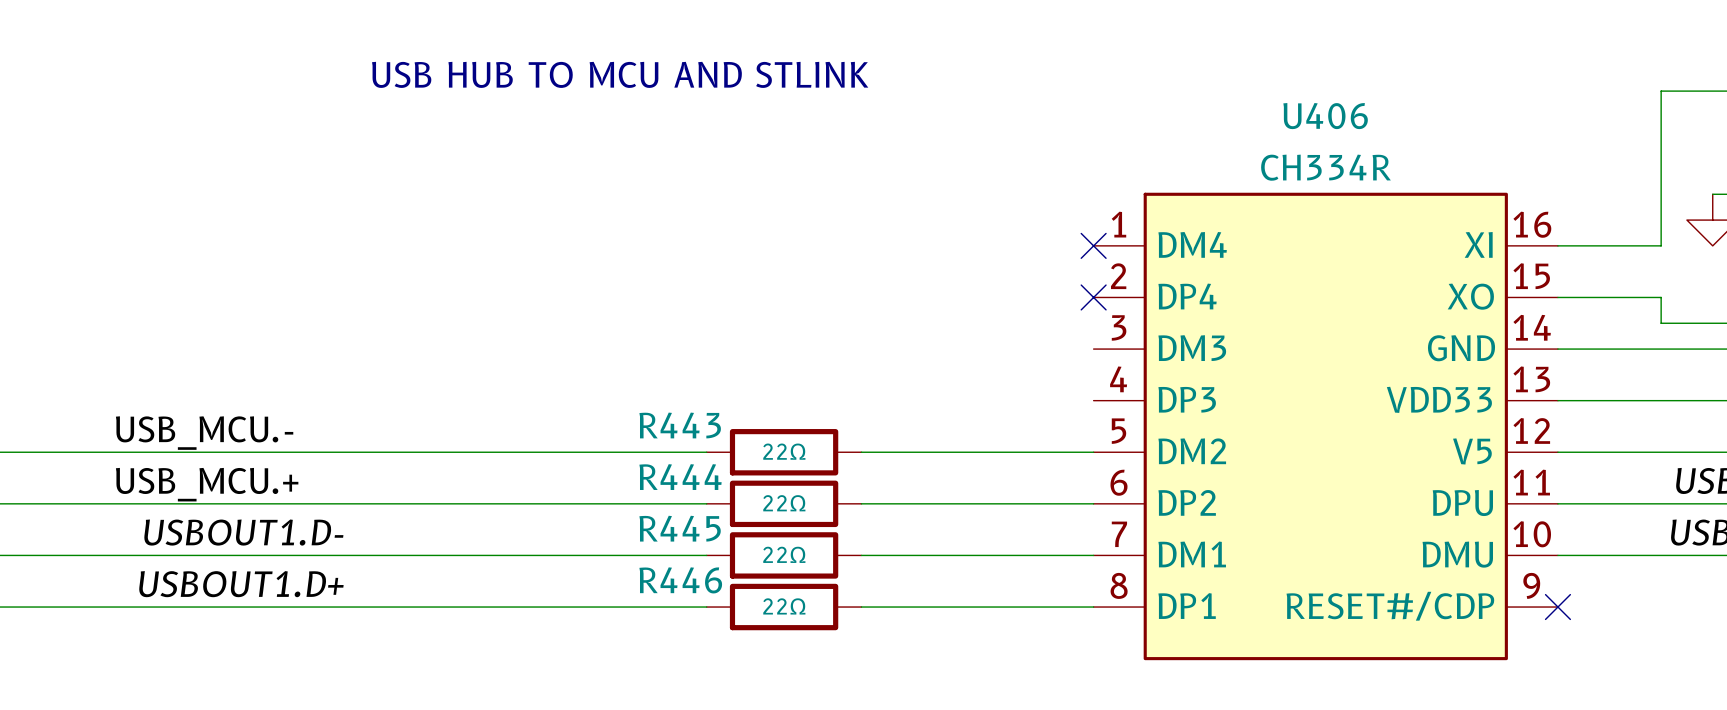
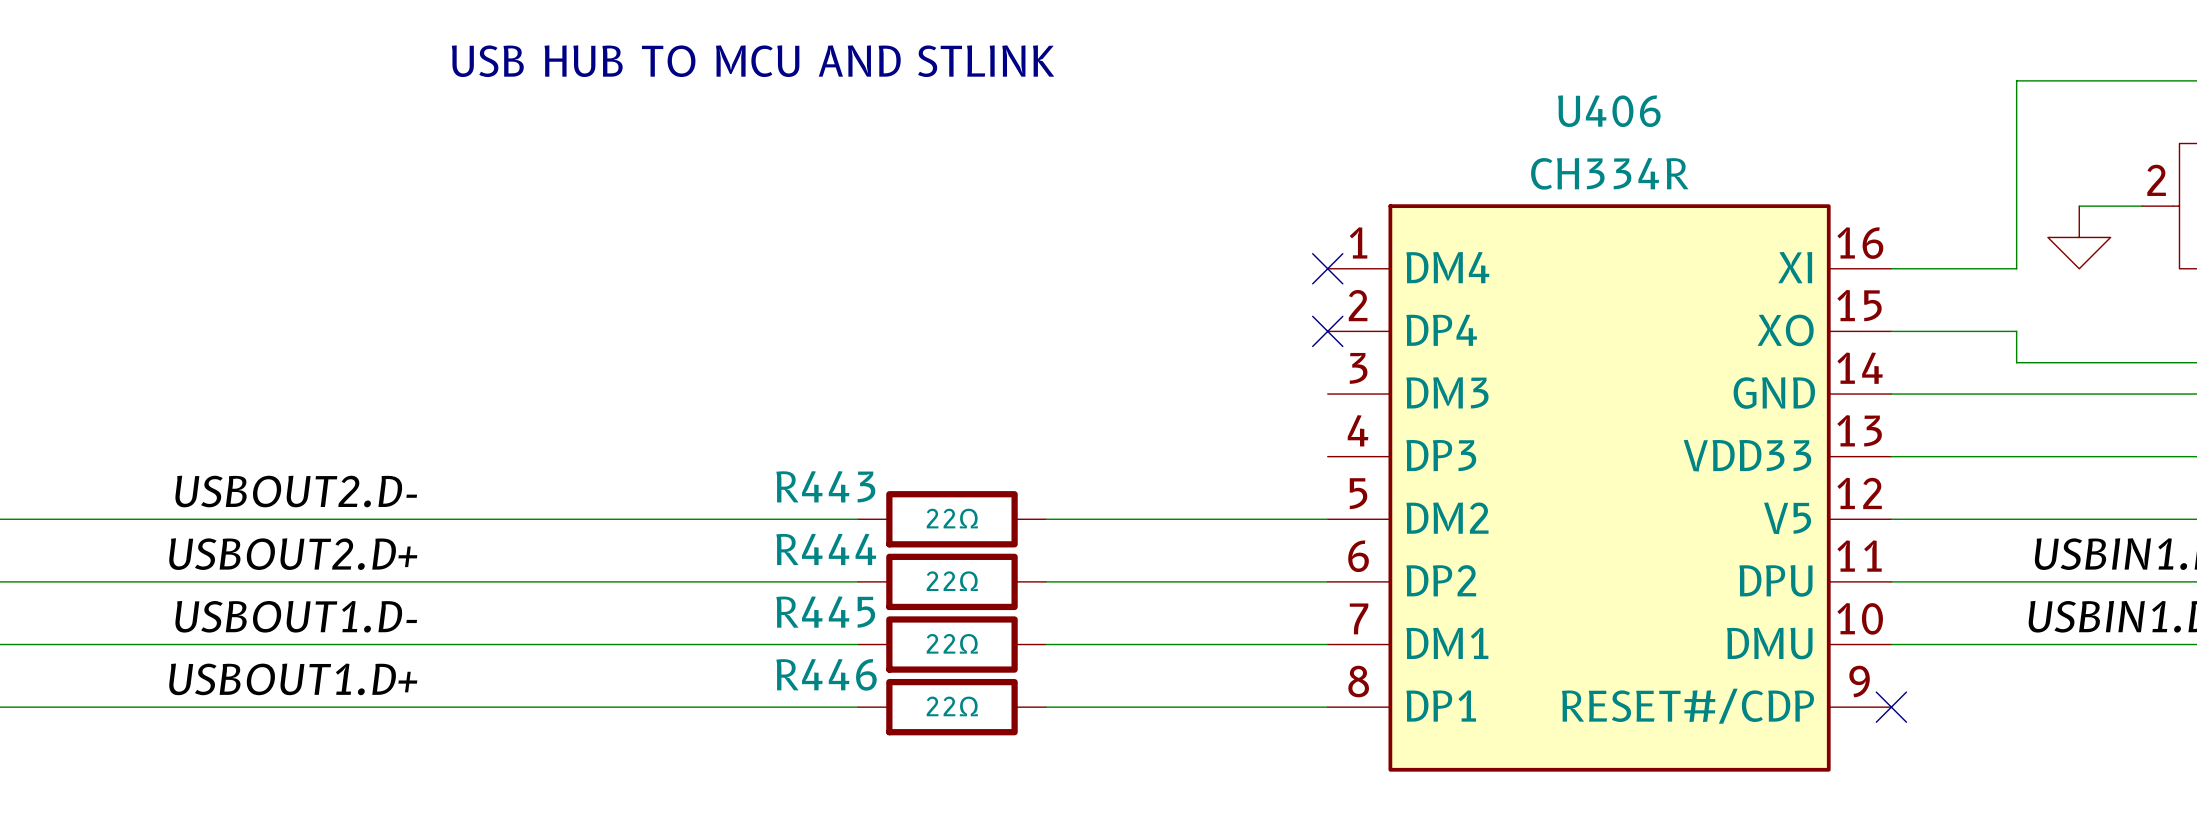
label: USB_MCU.- (204, 433) -> USBOUT2.D- (296, 491)
label: USB_MCU.+ (207, 484) -> USBOUT2.D+ (293, 554)

